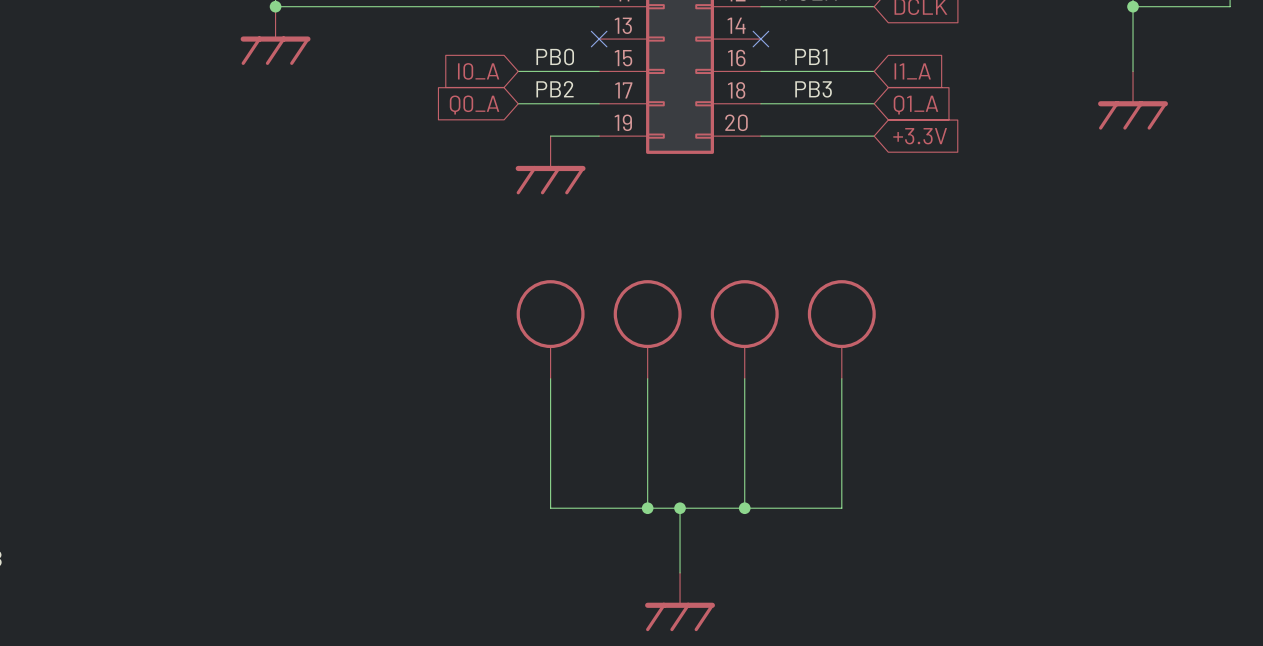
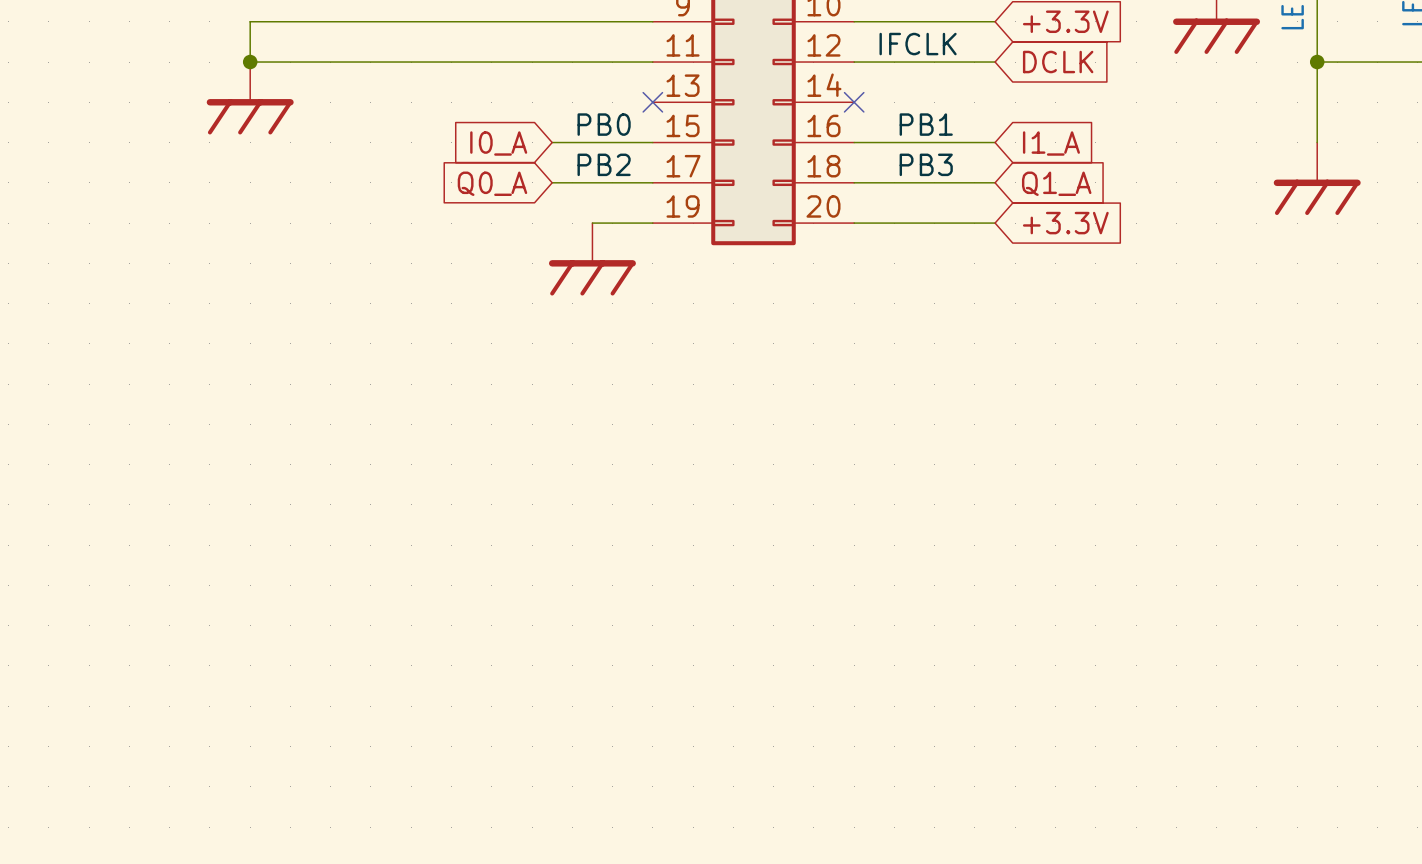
power symbol: (550, 329) -> none
power symbol: (647, 329) -> none
power symbol: (744, 329) -> none
power symbol: (841, 329) -> none
wire: (550, 378) (550, 508) (841, 508) (841, 378) -> none
wire: (647, 378) (647, 508) -> none
wire: (744, 378) (744, 508) -> none
junction: (647, 508) -> none
wire: (680, 508) (680, 572) -> none
junction: (680, 508) -> none
junction: (744, 508) -> none
power symbol: (680, 602) -> none

